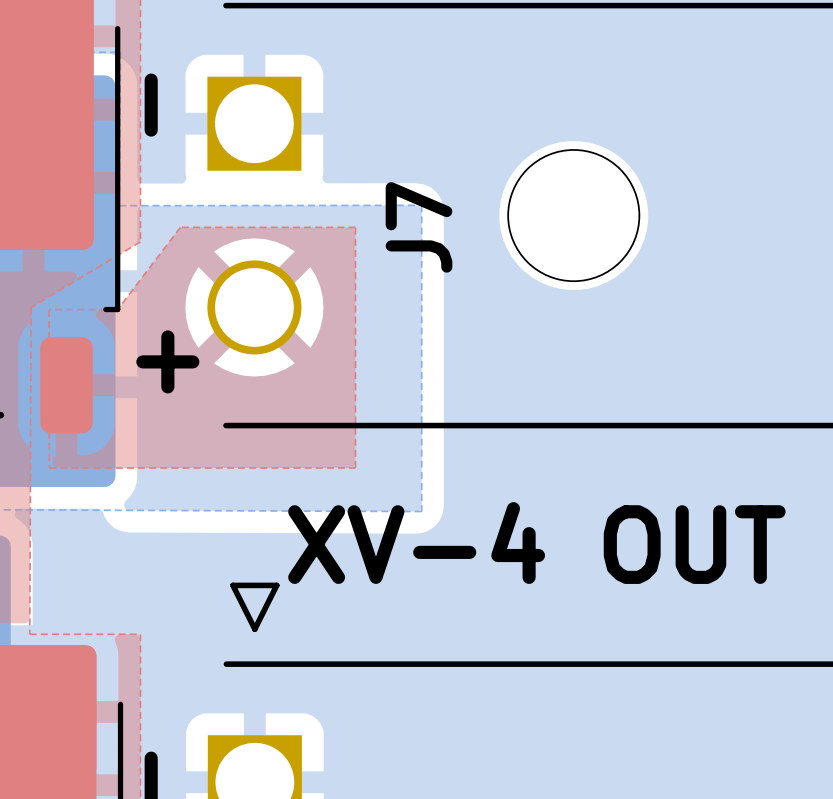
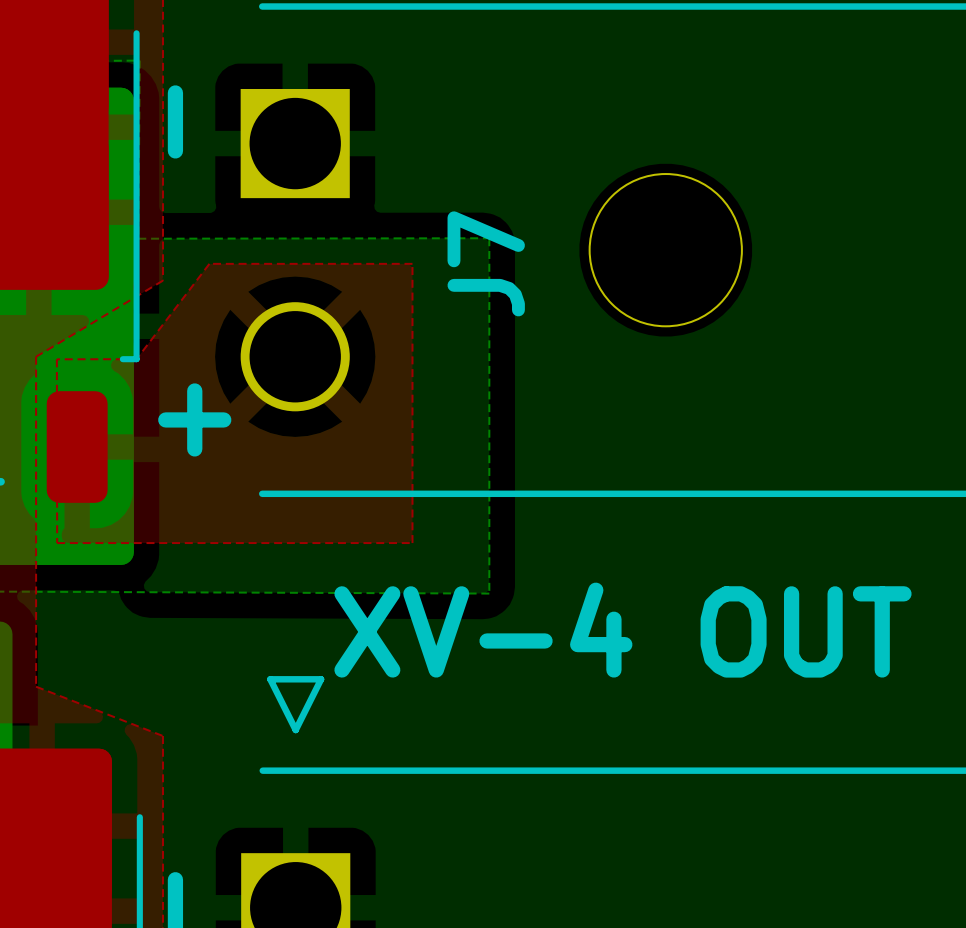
top zone outline: (31, 307) (29, 634) (140, 634) -> (36, 356) (36, 686) (162, 736)

